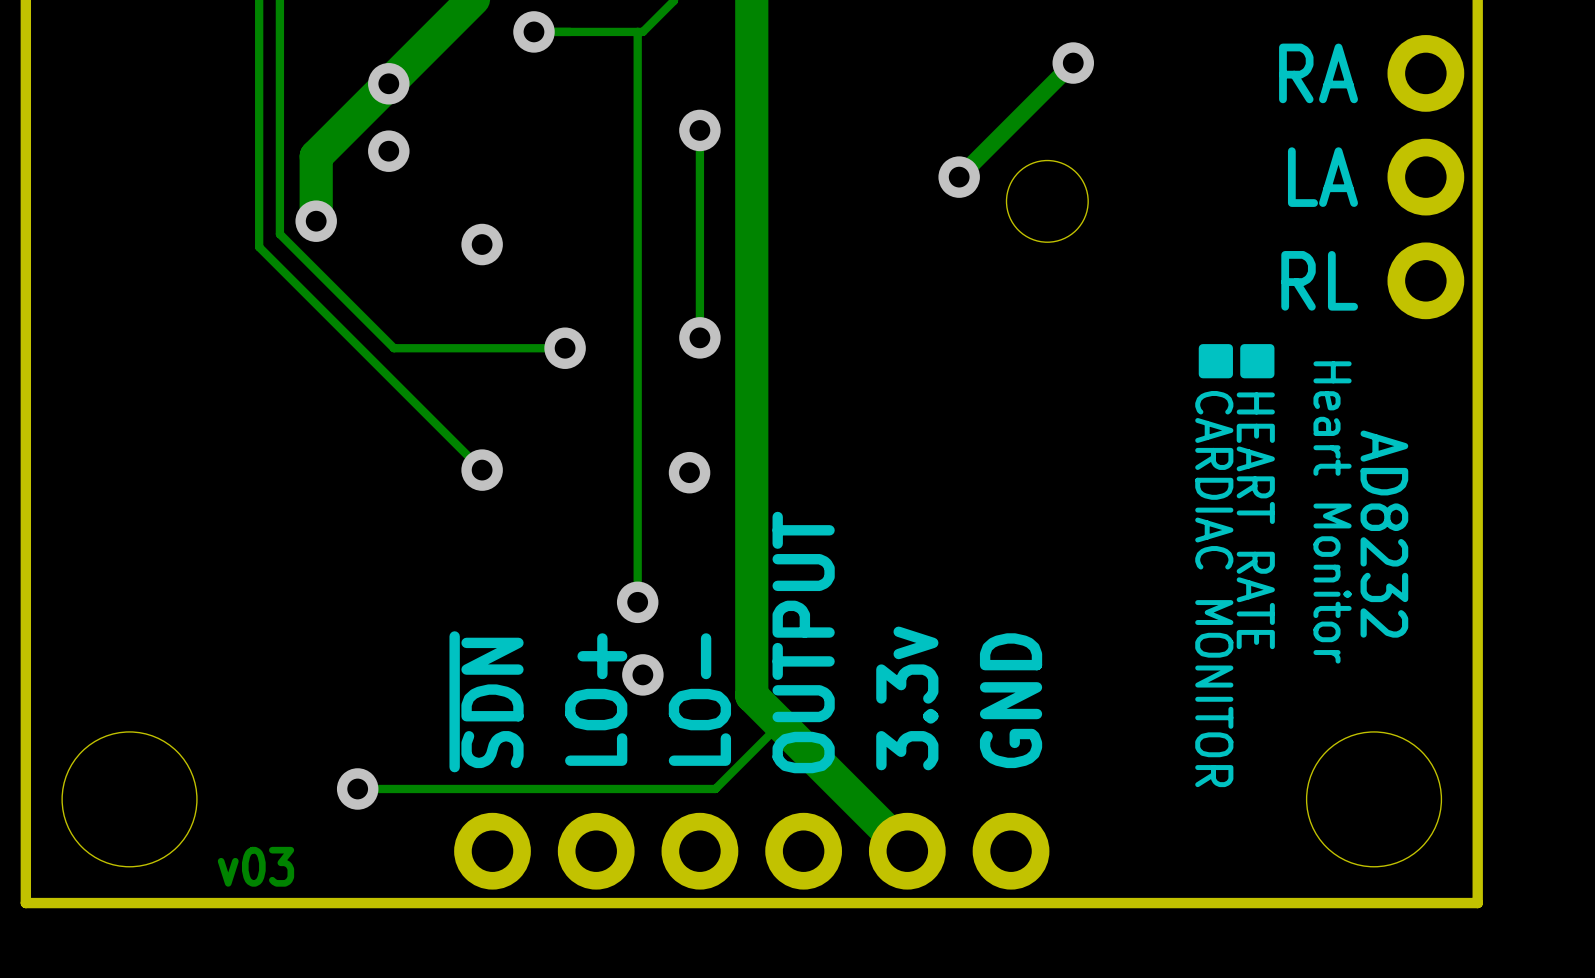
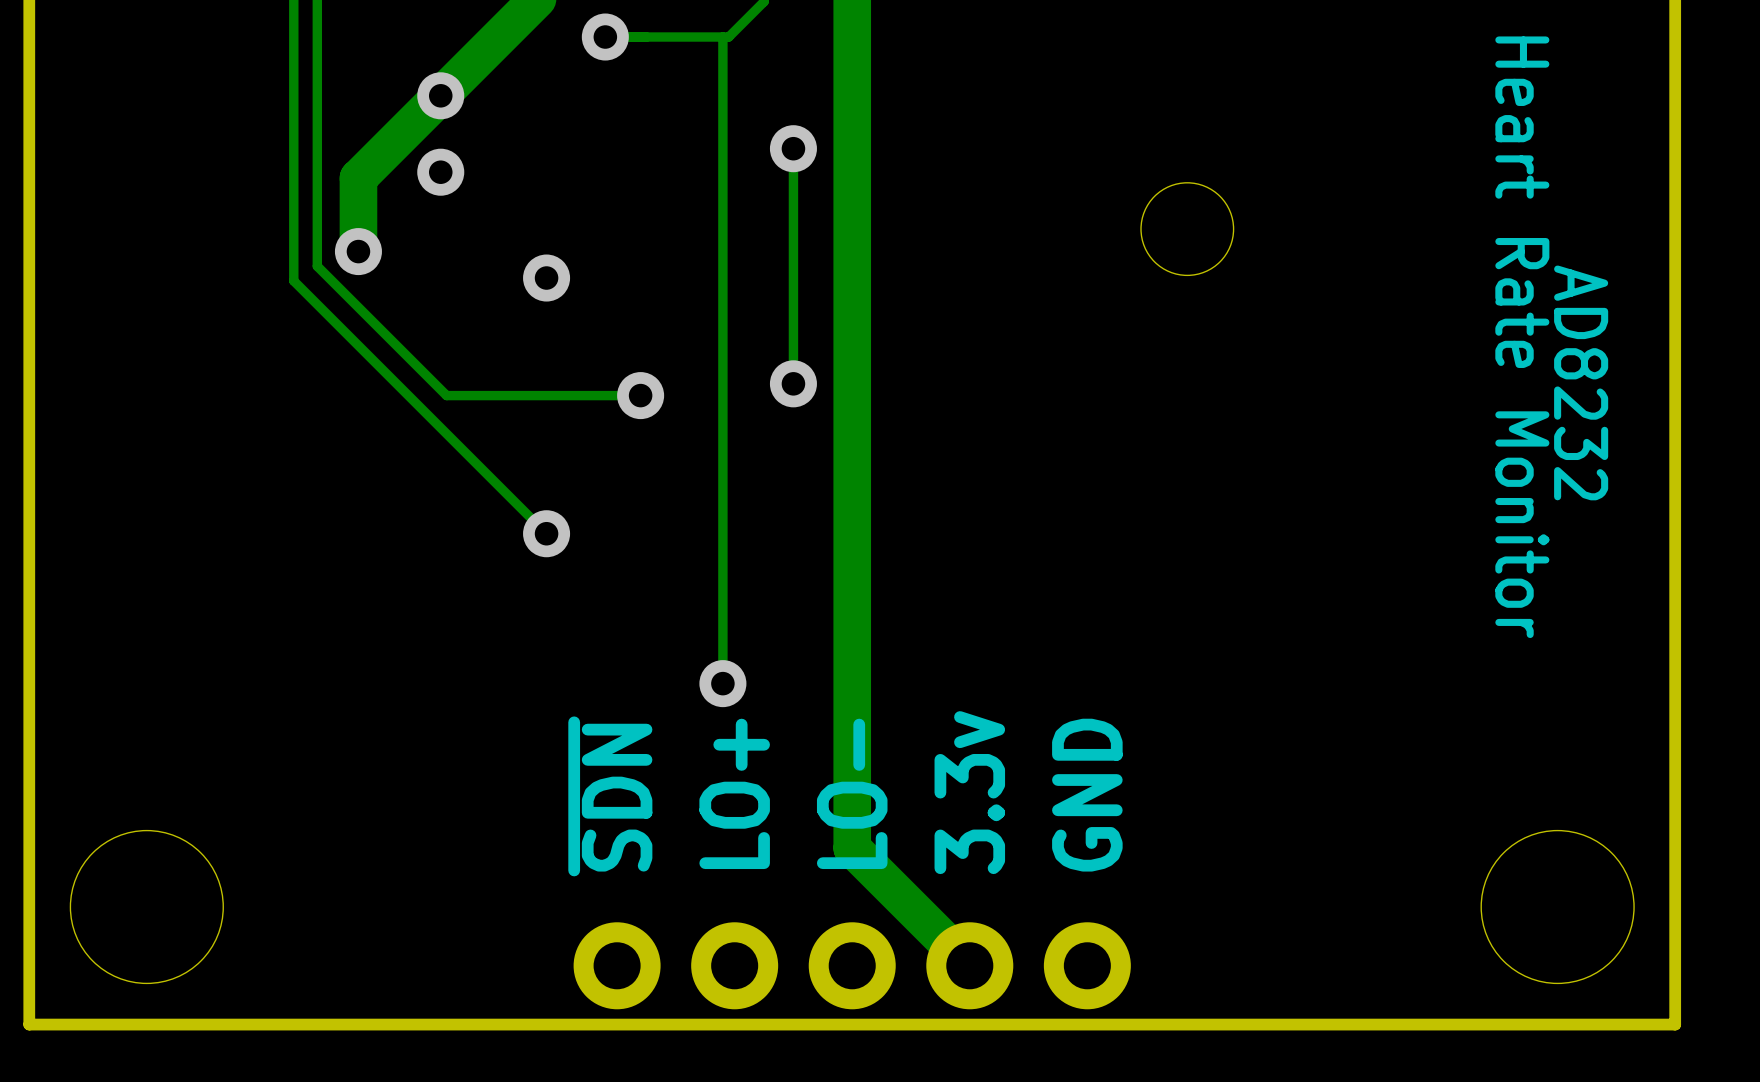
track: (1073, 63) (959, 177) -> none
via: (1073, 63) -> none
text: RA (1318, 73) -> none
via: (959, 177) -> none
text: LA (1322, 177) -> none
part: (1425, 177) -> none
text: RL (1319, 280) -> none
drawing: [1198, 344, 1275, 379] -> none
via: (689, 472) -> none
text: Heart Monitor (1332, 512) -> Heart Rate Monitor (1522, 337)
text: HEART RATE (1255, 520) -> none
text position: AD8232 (1384, 534) -> AD8232 (1581, 382)
text: CARDIAC MONITOR (1214, 589) -> none
text: OUTPUT (803, 642) -> none
via: (642, 674) -> none
track: (751, 695) (907, 851) -> (852, 789) (852, 848) (969, 965)
text position: 3.3v (907, 698) -> 3.3v (969, 792)
text position: LO+ (596, 699) -> LO+ (734, 793)
text position: LO- (699, 699) -> LO- (852, 793)
text position: GND (1011, 700) -> GND (1087, 795)
text position: ~{SDN} (486, 701) -> ~{SDN} (610, 796)
track: (780, 724) (715, 788) (357, 788) -> none
via: (357, 788) -> none
part footprint: [454, 812, 1050, 890] -> [573, 922, 1131, 1010]
text: v03 (255, 866) -> none

